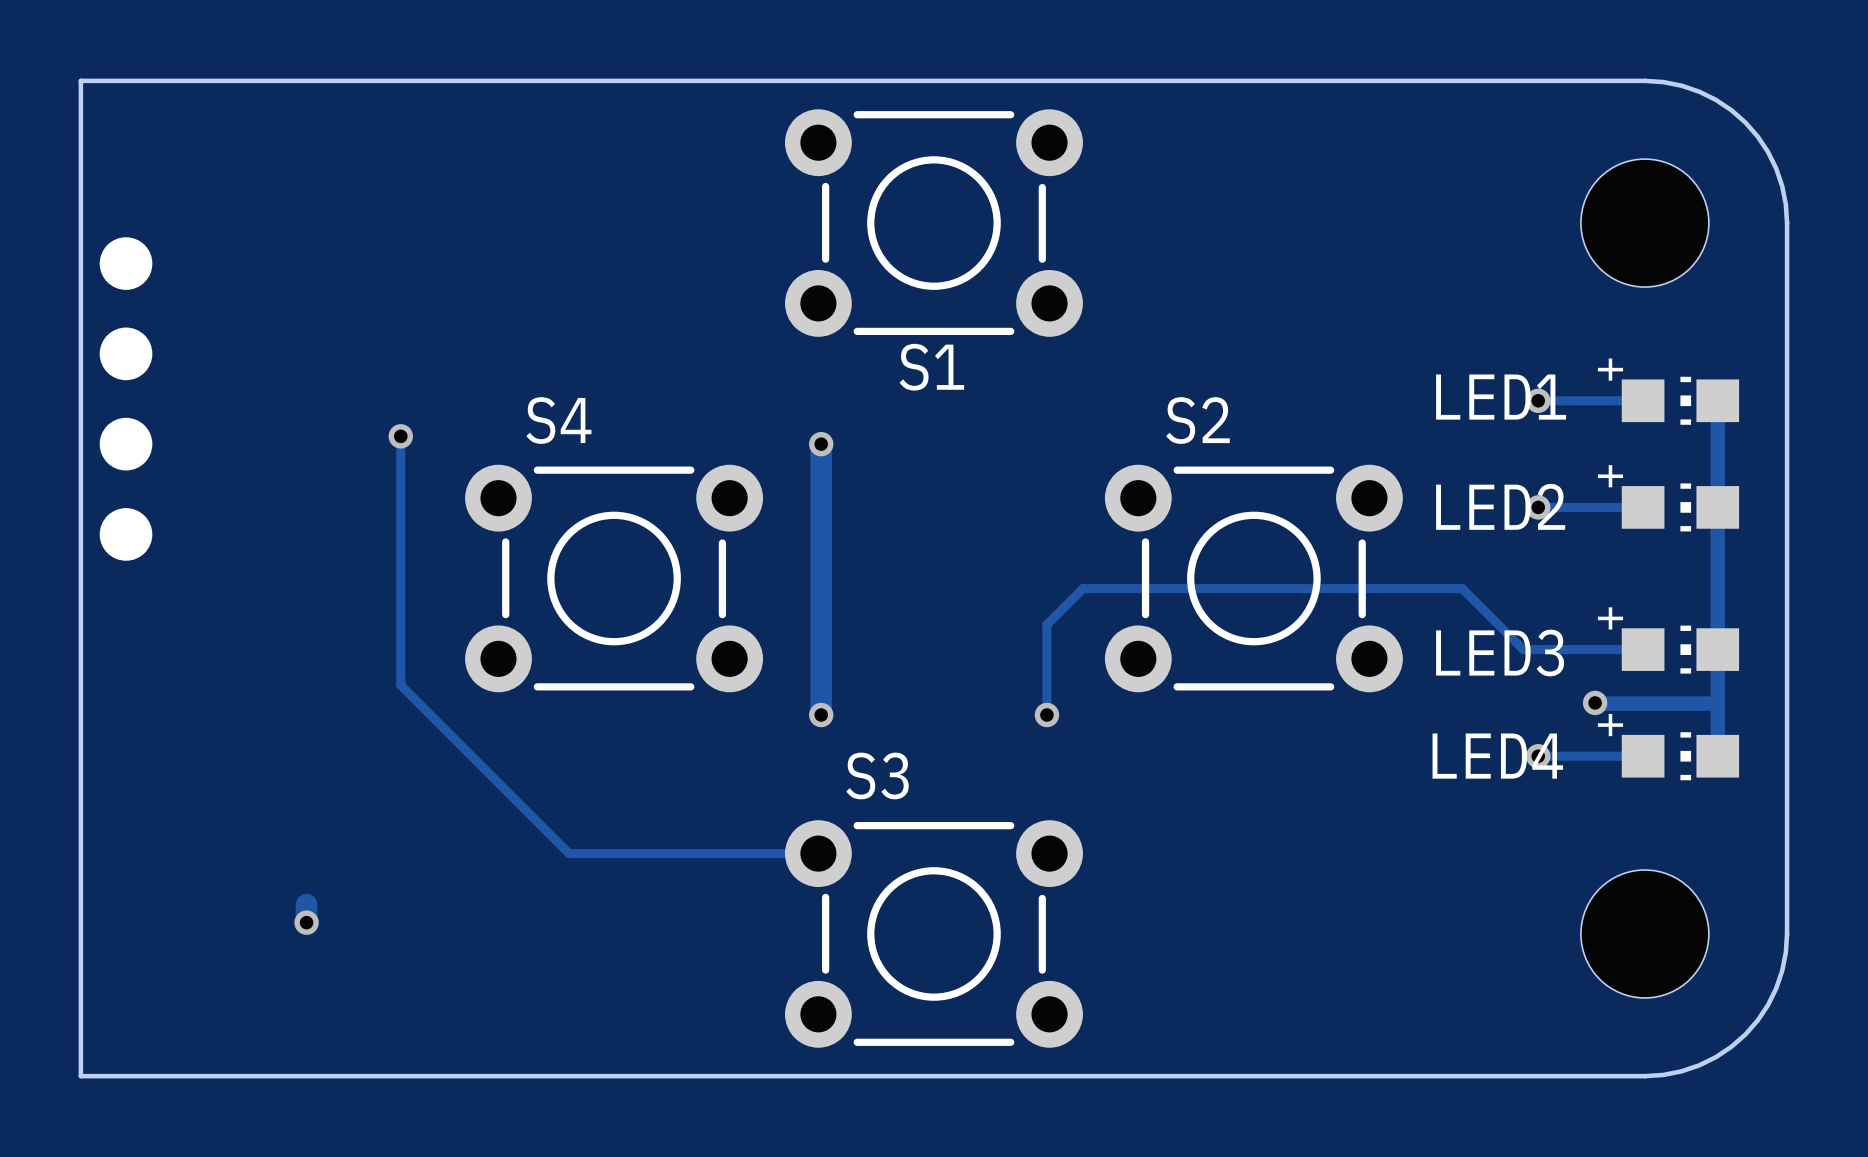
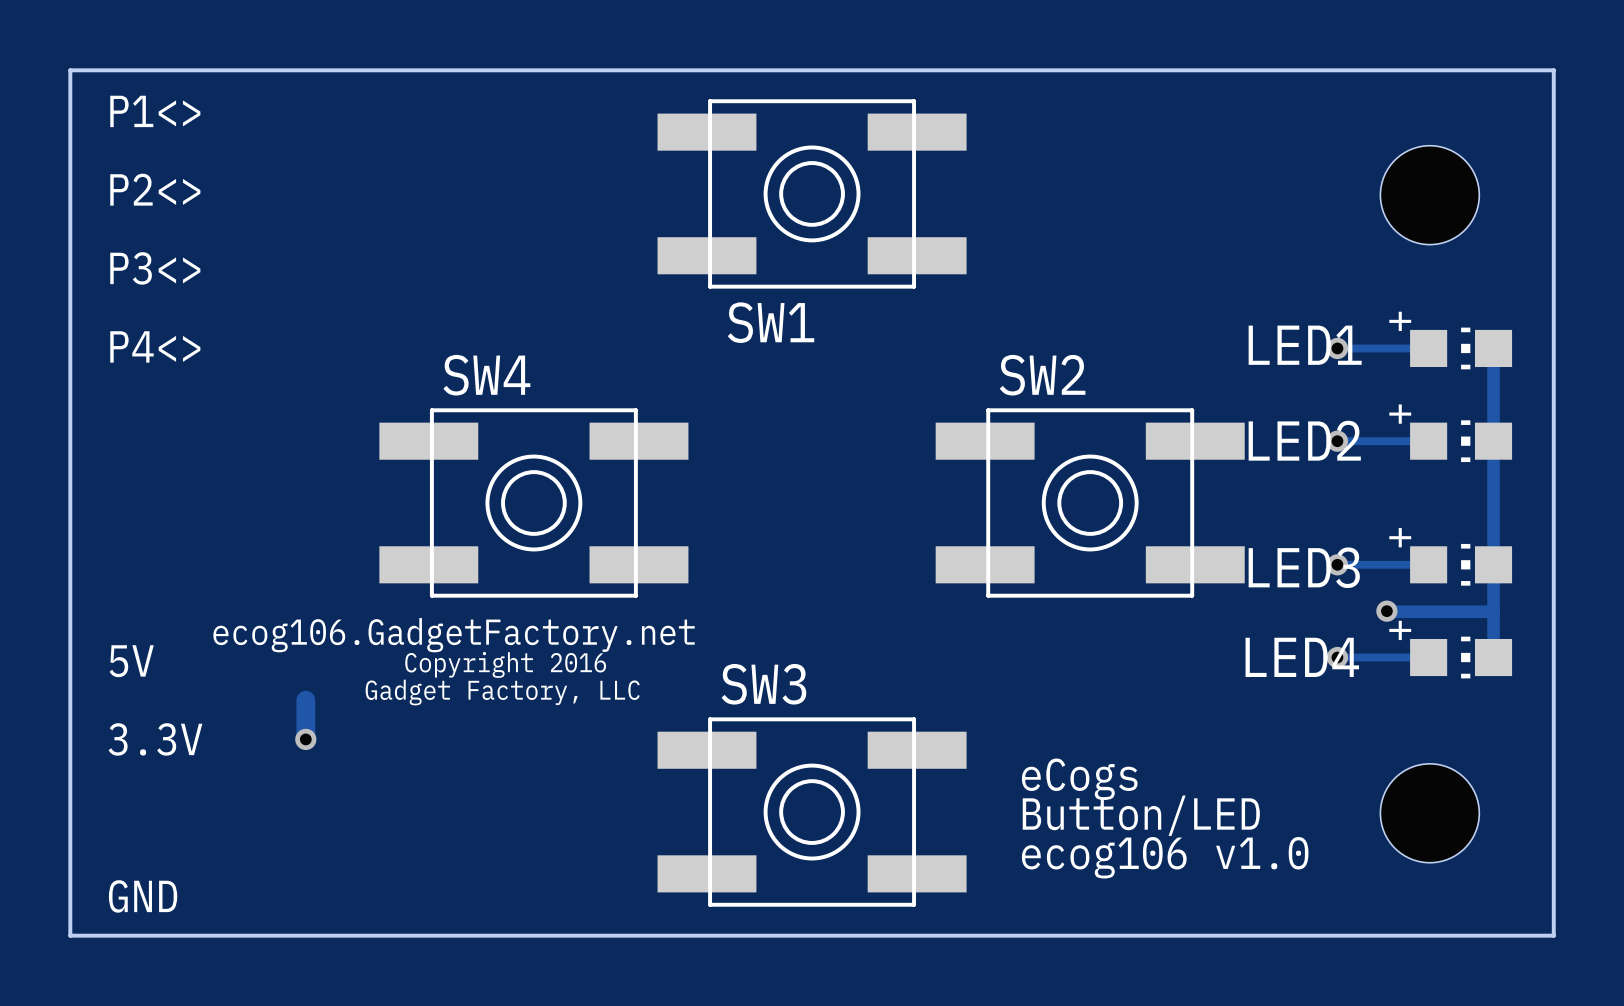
part footprint: [78, 78, 1790, 1079] -> [68, 68, 1556, 938]
text: none -> P1<> (155, 111)
text: none -> P2<> (155, 189)
S1: (933, 223) -> none
SW1: none -> (812, 193)
drawing: [99, 237, 153, 561] -> none
text: none -> P3<> (155, 268)
text: none -> P4<> (155, 346)
track: (400, 436) (400, 685) (569, 853) (818, 853) -> none
via: (400, 436) -> none
track: (821, 444) (821, 715) -> none
via: (821, 444) -> none
S4: (614, 578) -> none
SW4: none -> (533, 502)
S2: (1253, 578) -> none
SW2: none -> (1090, 502)
track: (1538, 649) (1523, 649) (1462, 588) (1083, 588) (1046, 624) (1046, 715) -> none
via: none -> (1337, 564)
via: (821, 715) -> none
via: (1046, 715) -> none
text: none -> ecog106.GadgetFactory.net (454, 635)
text: none -> 5V (131, 661)
text: none -> Copyright 2016 (505, 664)
text: none -> Gadget Factory, LLC (502, 692)
track: none -> (305, 700) (305, 739)
text: none -> 3.3V (155, 739)
text: none -> eCogs (1079, 779)
track: (306, 904) (306, 922) -> none
via position: (306, 922) -> (305, 739)
S3: (933, 933) -> none
SW3: none -> (812, 812)
text: none -> Button/LED (1141, 815)
text: none -> ecog106 v1.0 (1165, 857)
text: none -> GND (143, 896)

